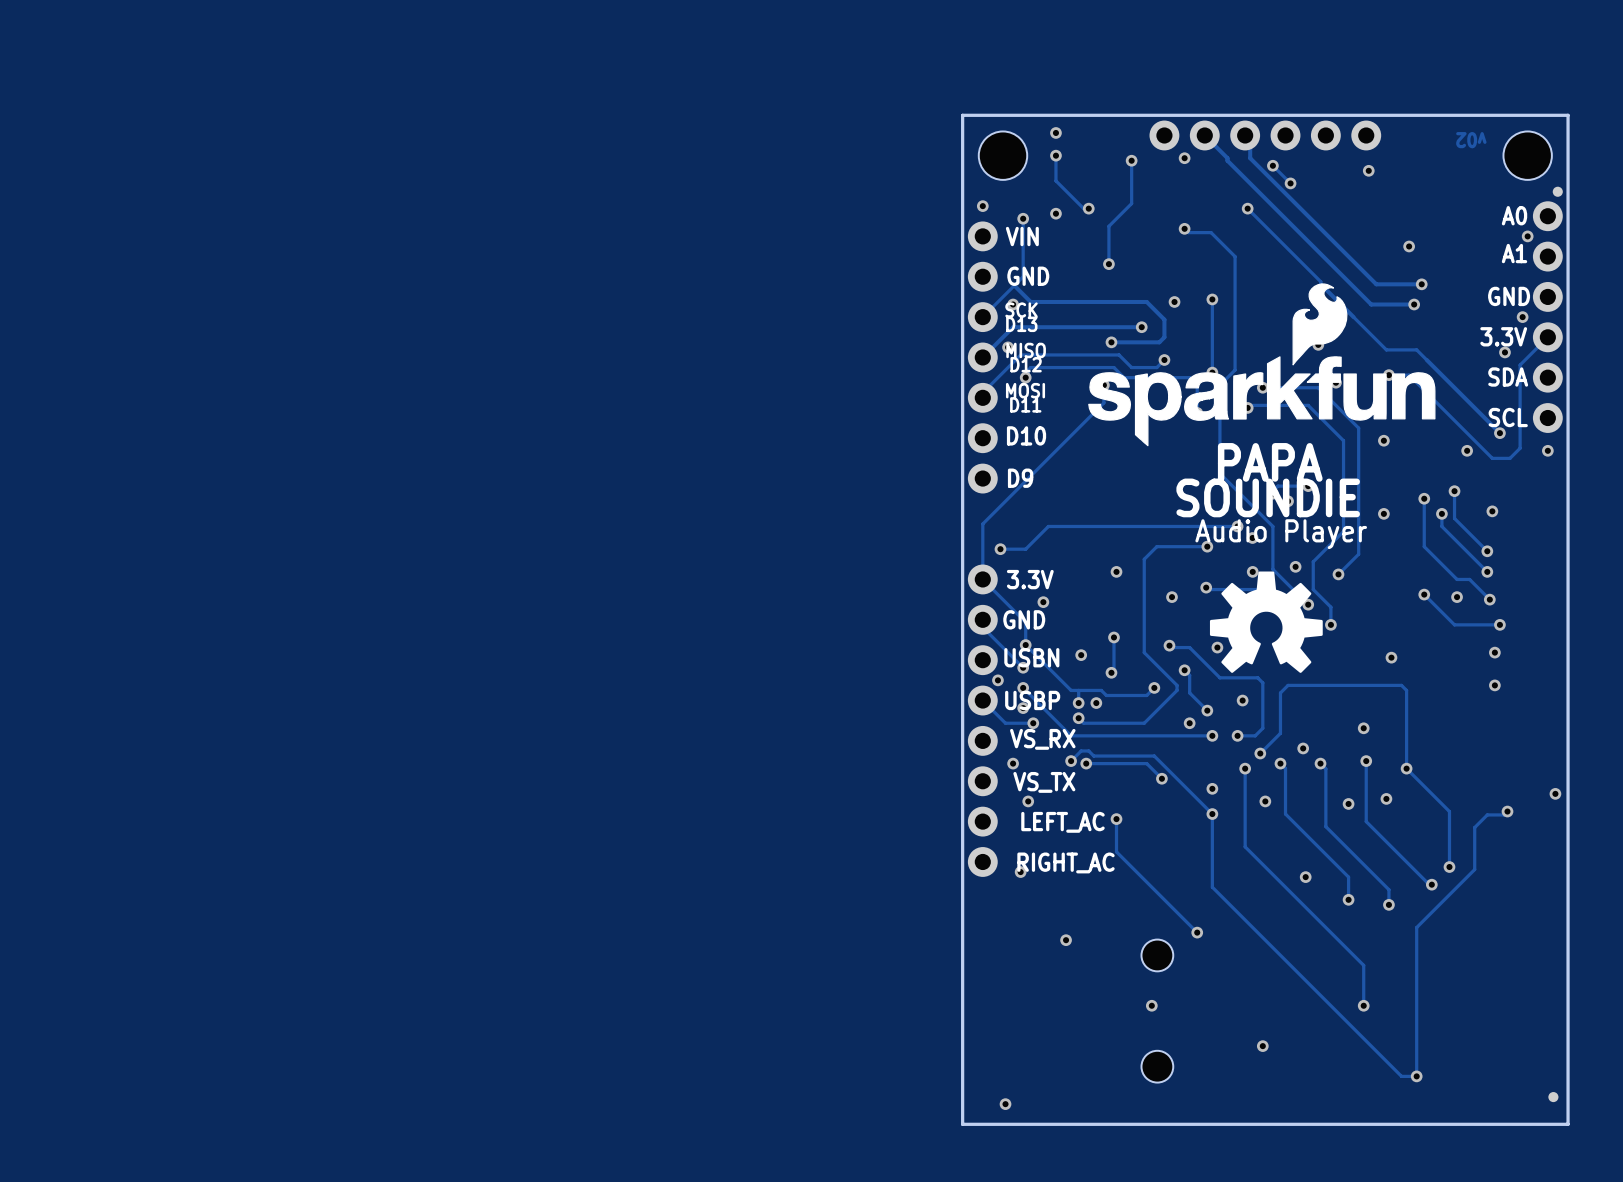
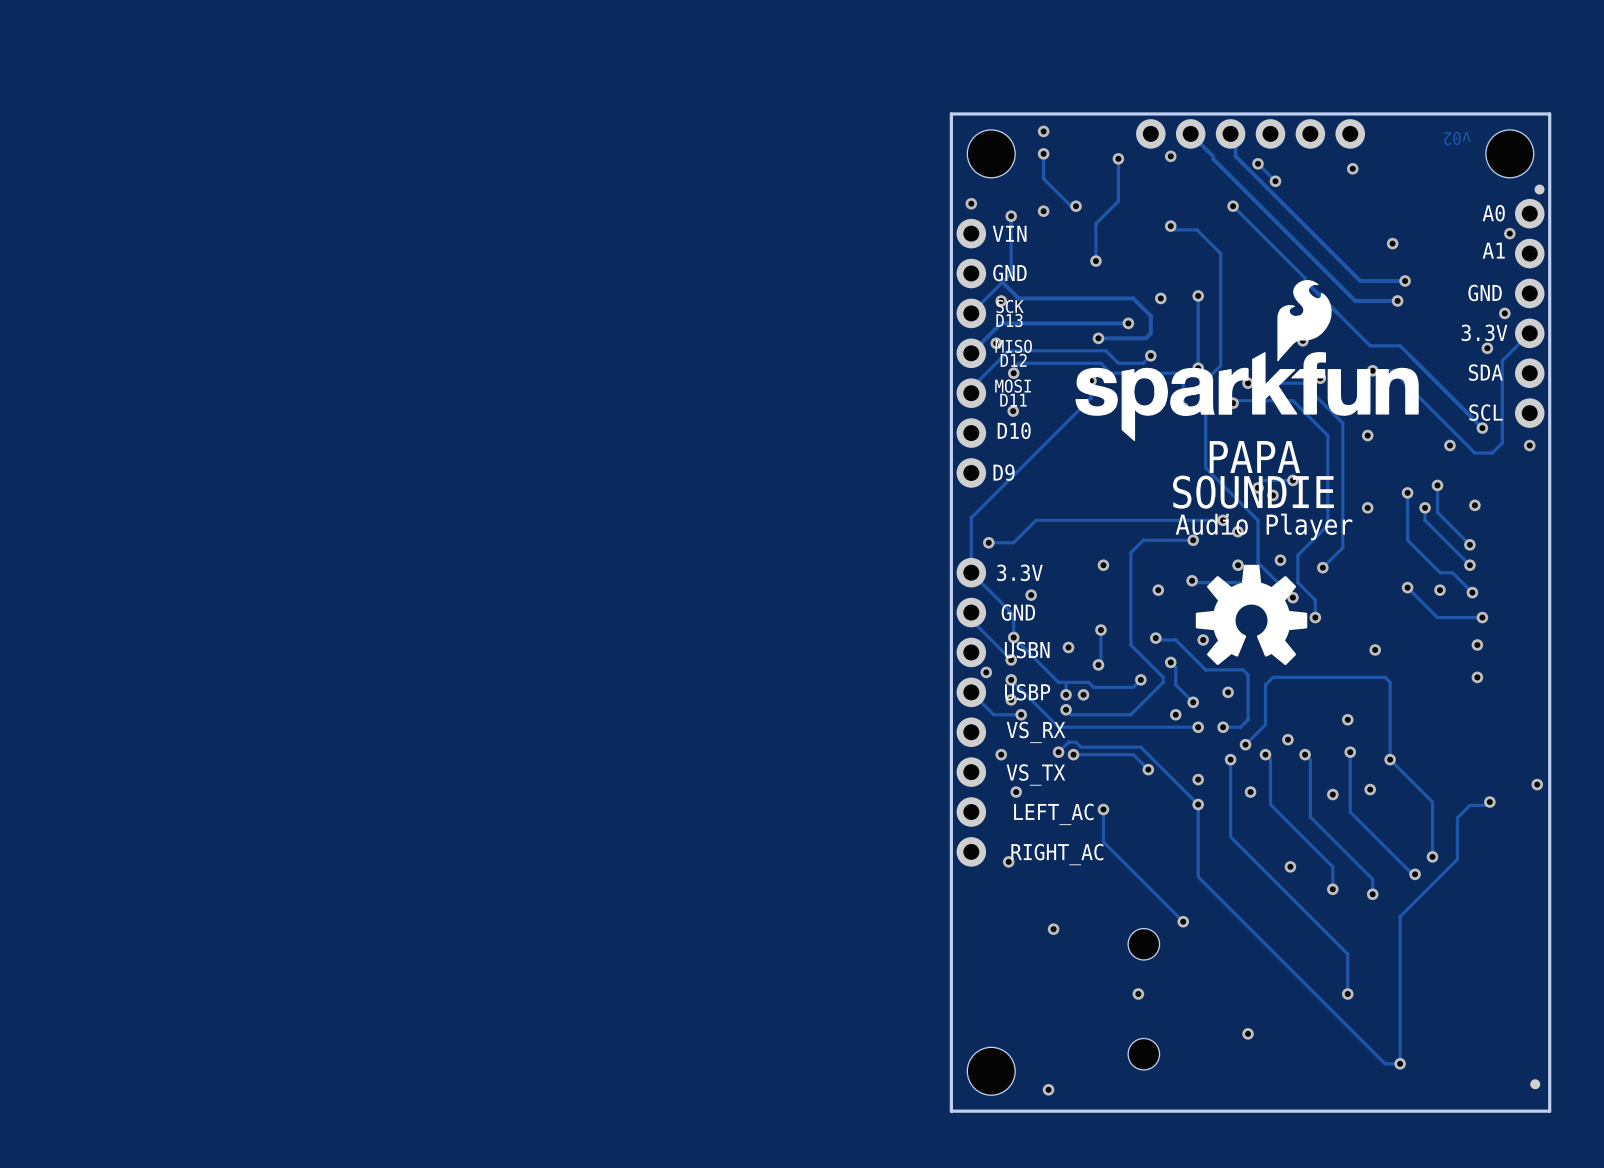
via: none -> (1013, 411)
part: none -> (991, 1071)
via position: (1005, 1104) -> (1048, 1089)

